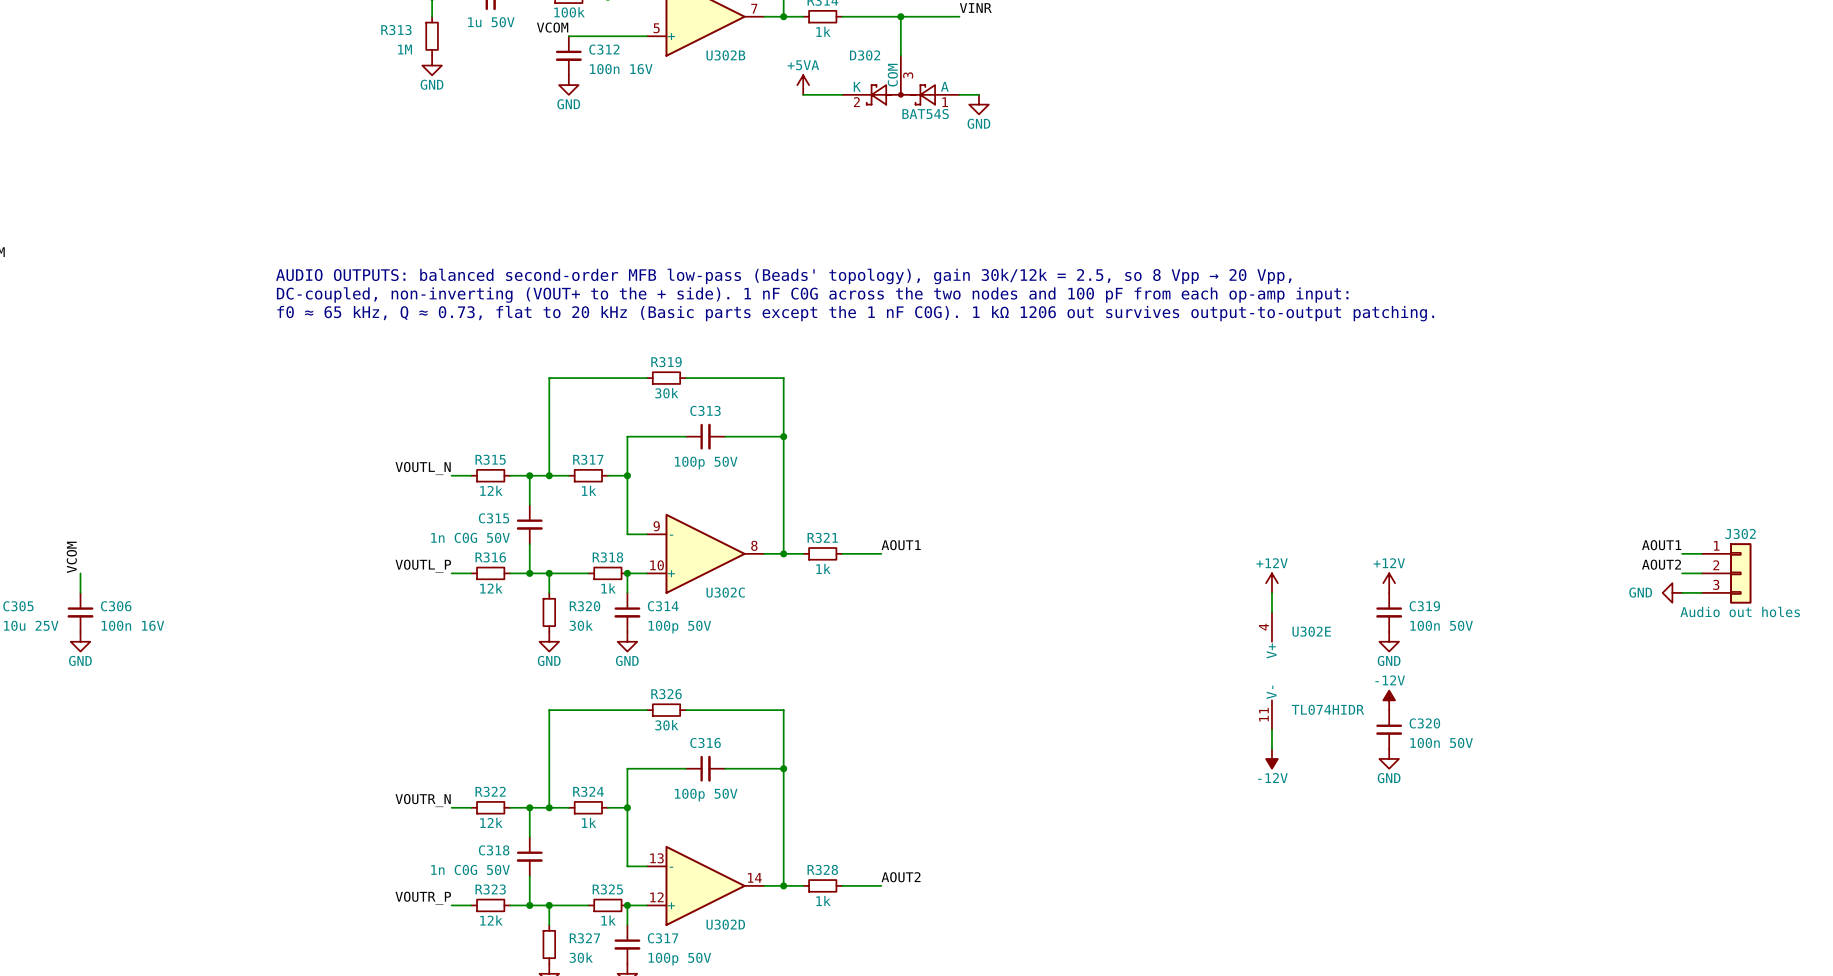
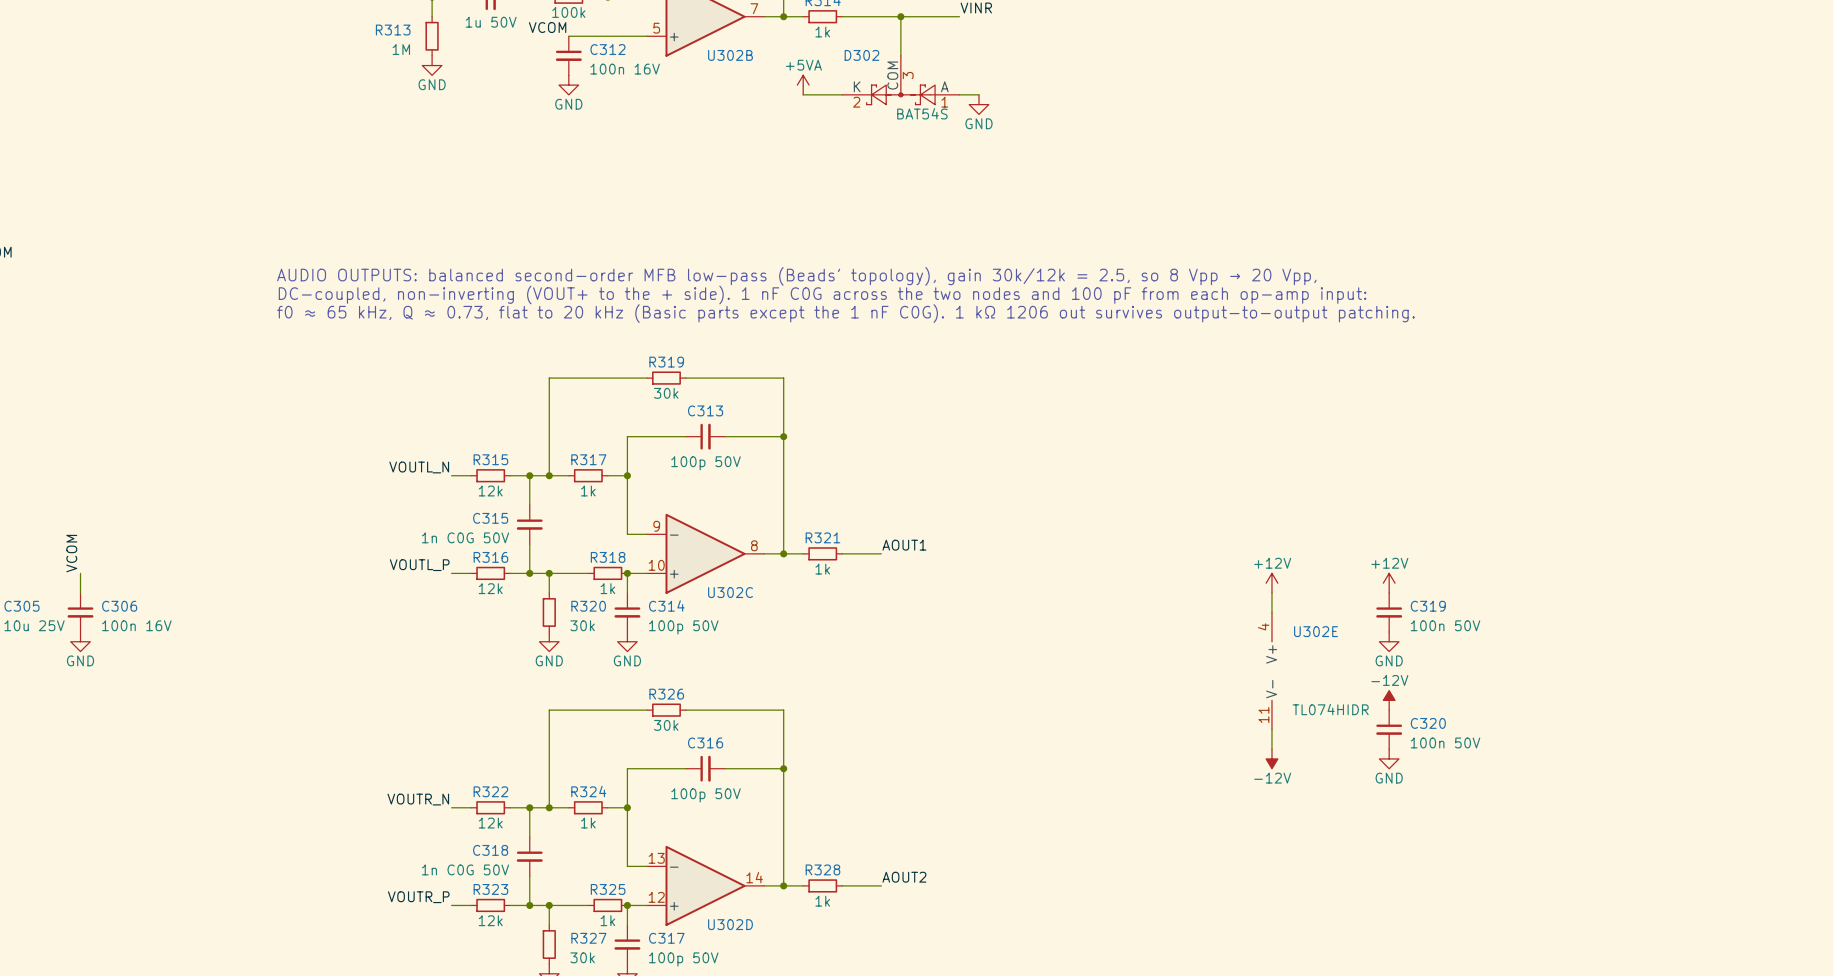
label: AOUT1 (1661, 545) -> none
wire: (1682, 553) (1701, 553) -> none
label: AOUT2 (1661, 564) -> none
wire: (1682, 573) (1701, 573) -> none
J302: Audio out holes (1726, 573) -> none
power symbol: GND (1672, 592) -> none
wire: (1682, 592) (1701, 592) -> none

